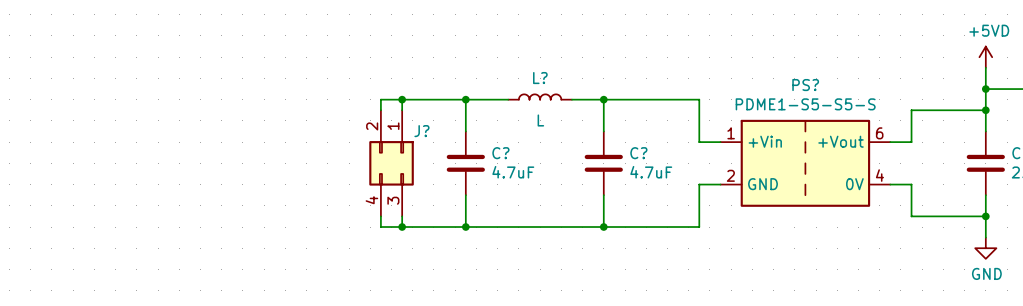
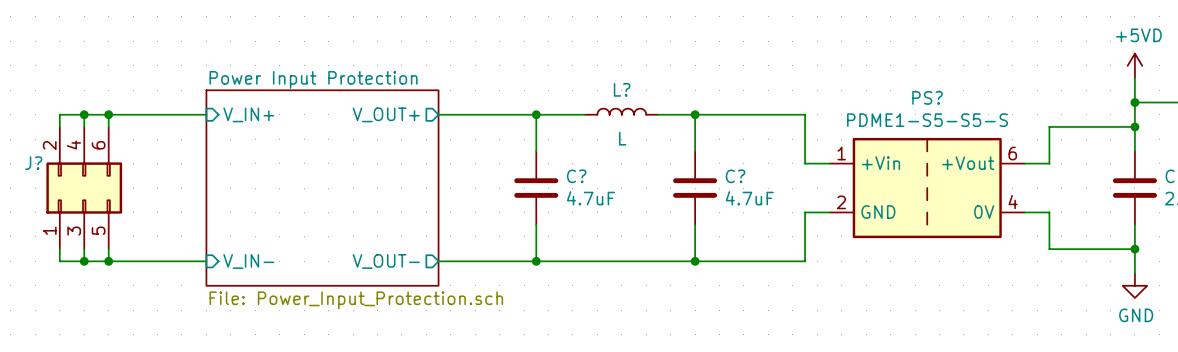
wire: none -> (84, 114) (84, 126)
junction: none -> (84, 114)
wire: none -> (108, 114) (108, 126)
junction: none -> (108, 114)
wire: none -> (206, 114) (59, 114) (59, 126)
sheet pin: none -> V_IN+ (248, 114)
sheet pin: none -> V_OUT+ (386, 114)
wire: (402, 99) (402, 110) -> none
junction: (402, 99) -> none
J?: none -> (84, 188)
sheet Power Input Protection: none -> File: Power_Input_Protection.sch (322, 188)
J?: (391, 163) -> none
wire: none -> (59, 249) (59, 261) (206, 261)
wire: none -> (84, 249) (84, 261)
wire: none -> (108, 249) (108, 261)
wire: (402, 216) (402, 227) -> none
junction: none -> (84, 261)
junction: none -> (108, 261)
sheet pin: none -> V_IN- (248, 261)
sheet pin: none -> V_OUT- (386, 261)
junction: (402, 227) -> none

